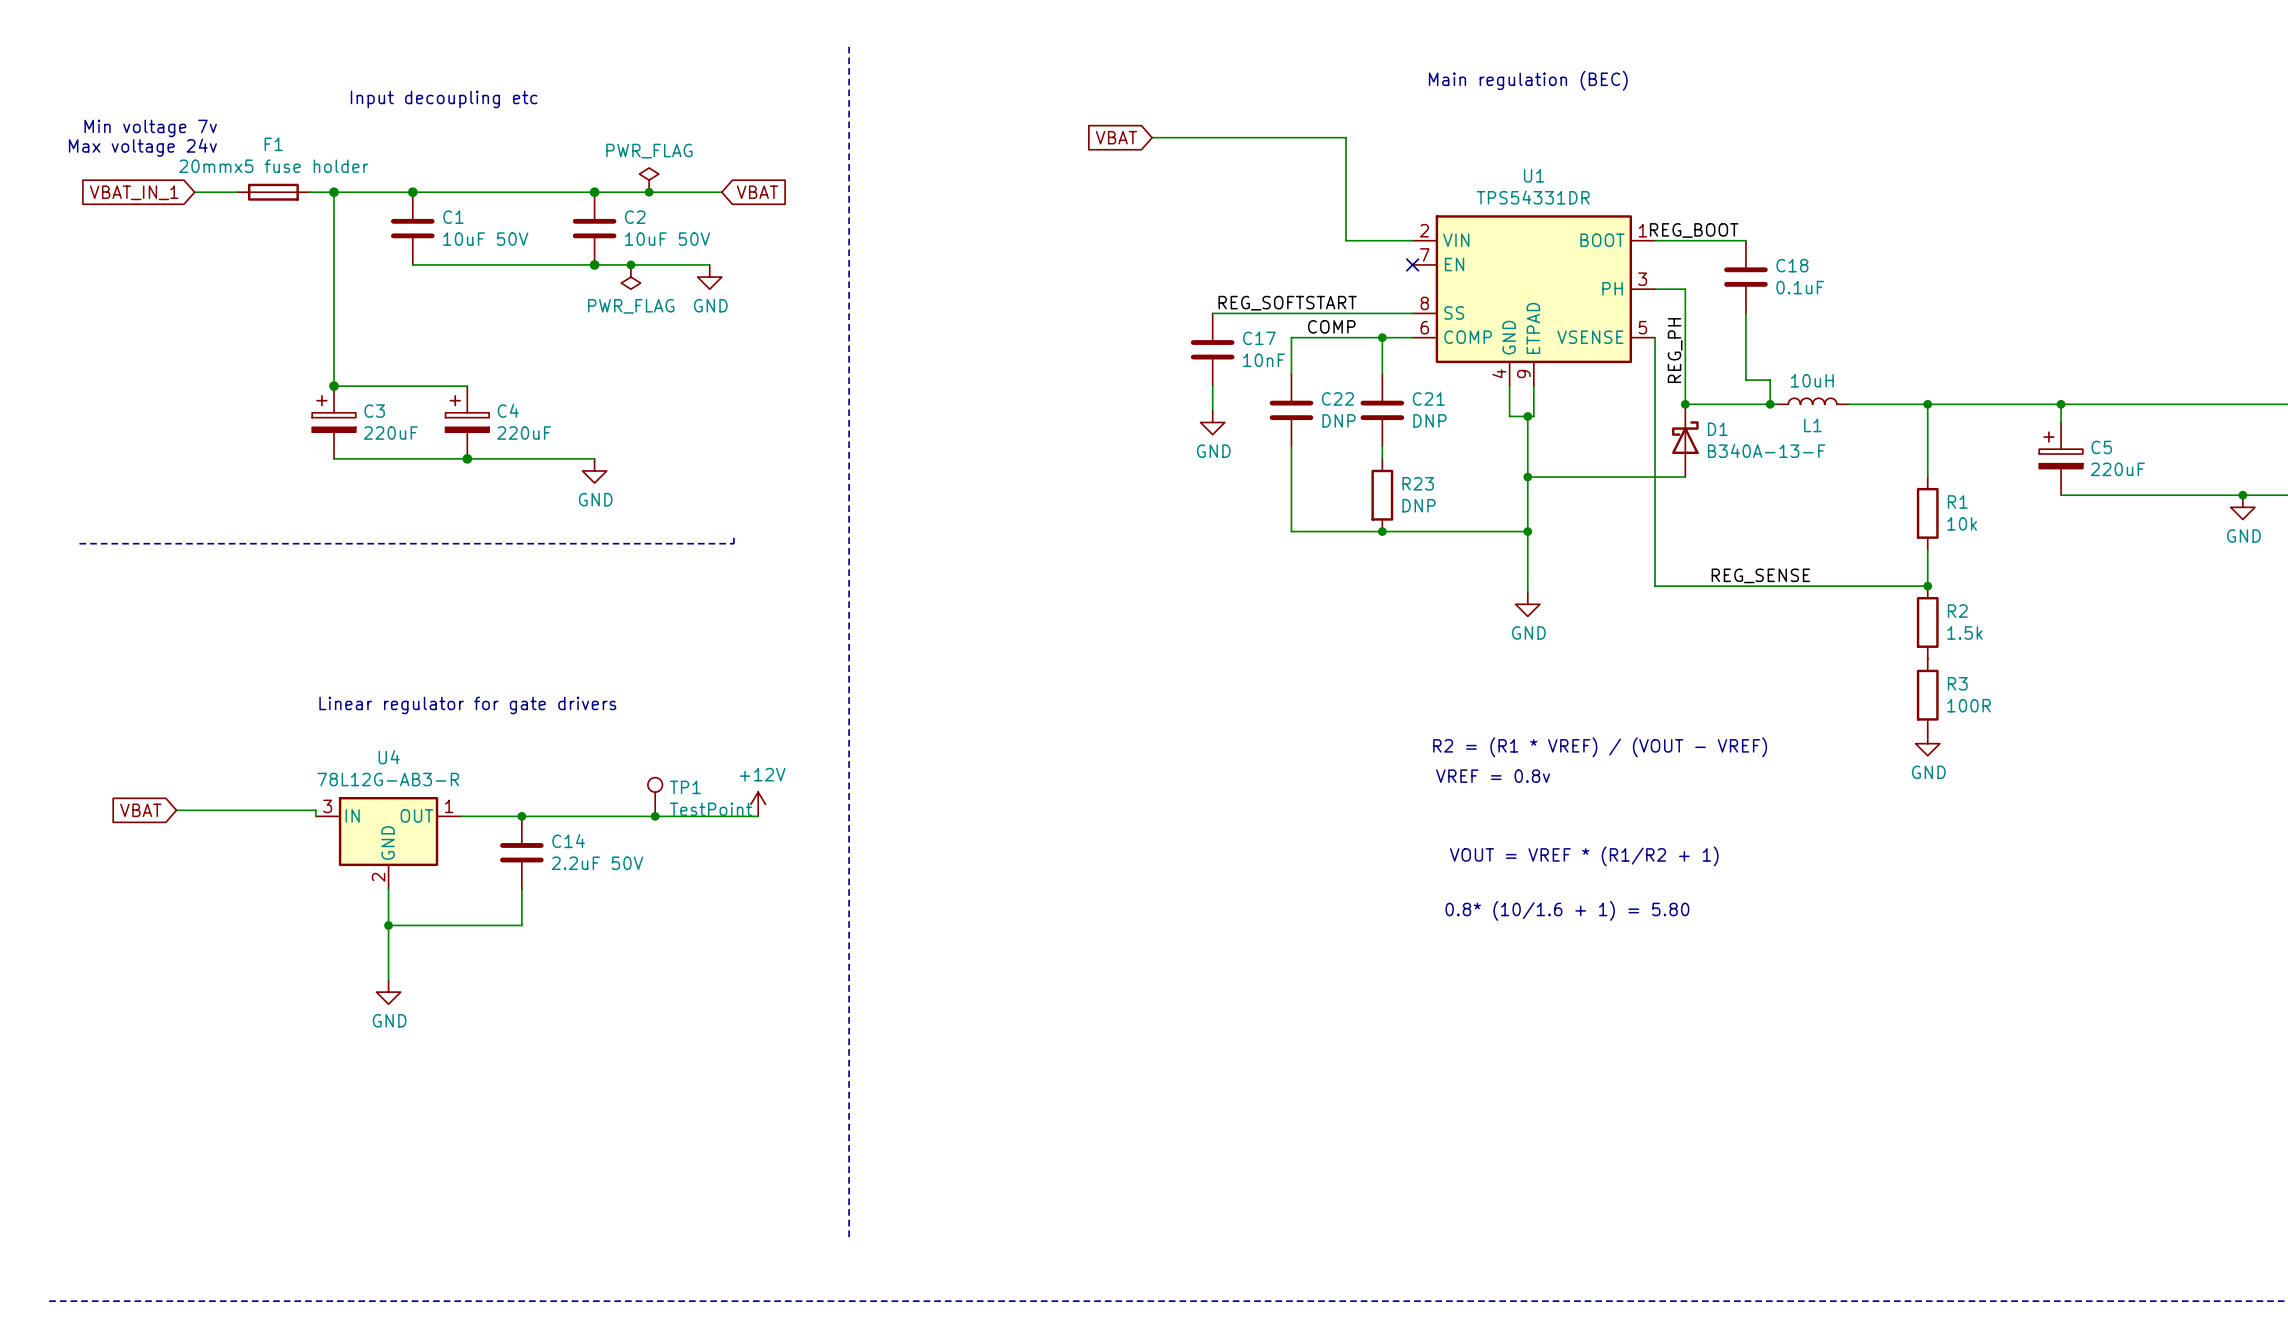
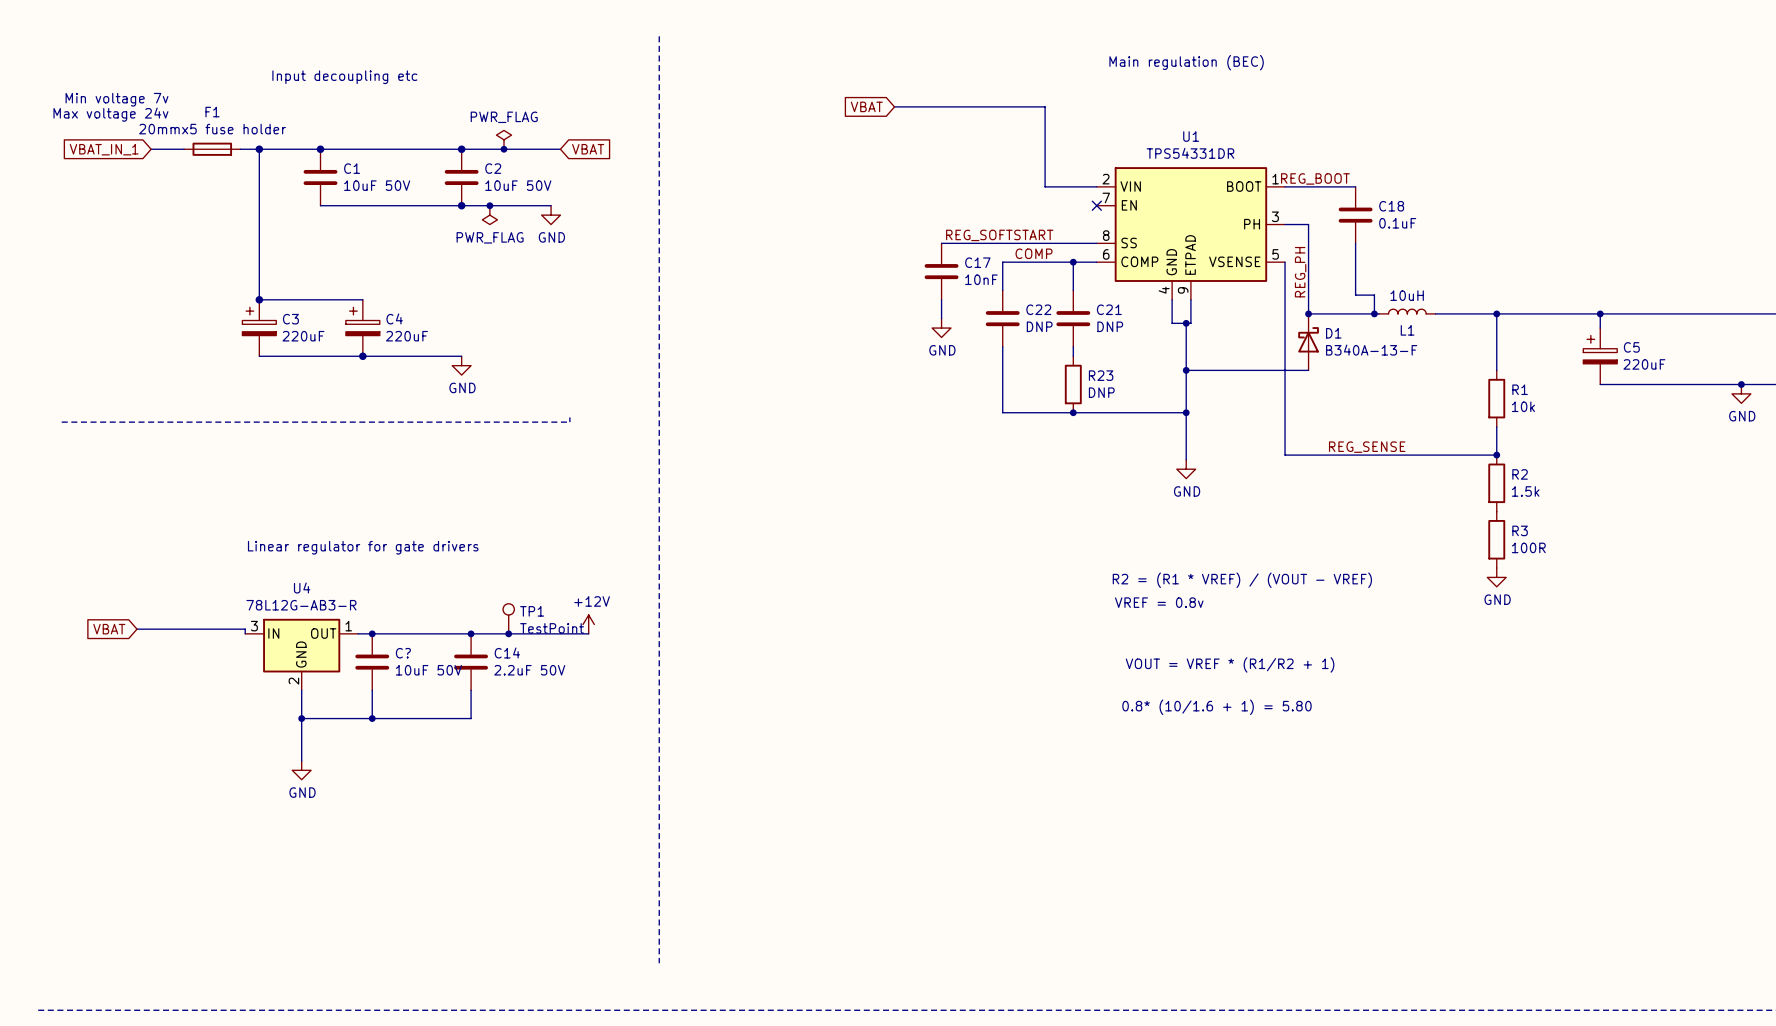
junction: none -> (372, 633)
junction: (521, 816) -> none
junction: none -> (471, 633)
C?: none -> 10uF 50V (372, 662)
C14 position: (521, 852) -> (471, 662)
wire: none -> (372, 690) (372, 718)
wire: (521, 889) (521, 925) -> (471, 690) (471, 718) (405, 718)
junction: none -> (372, 718)

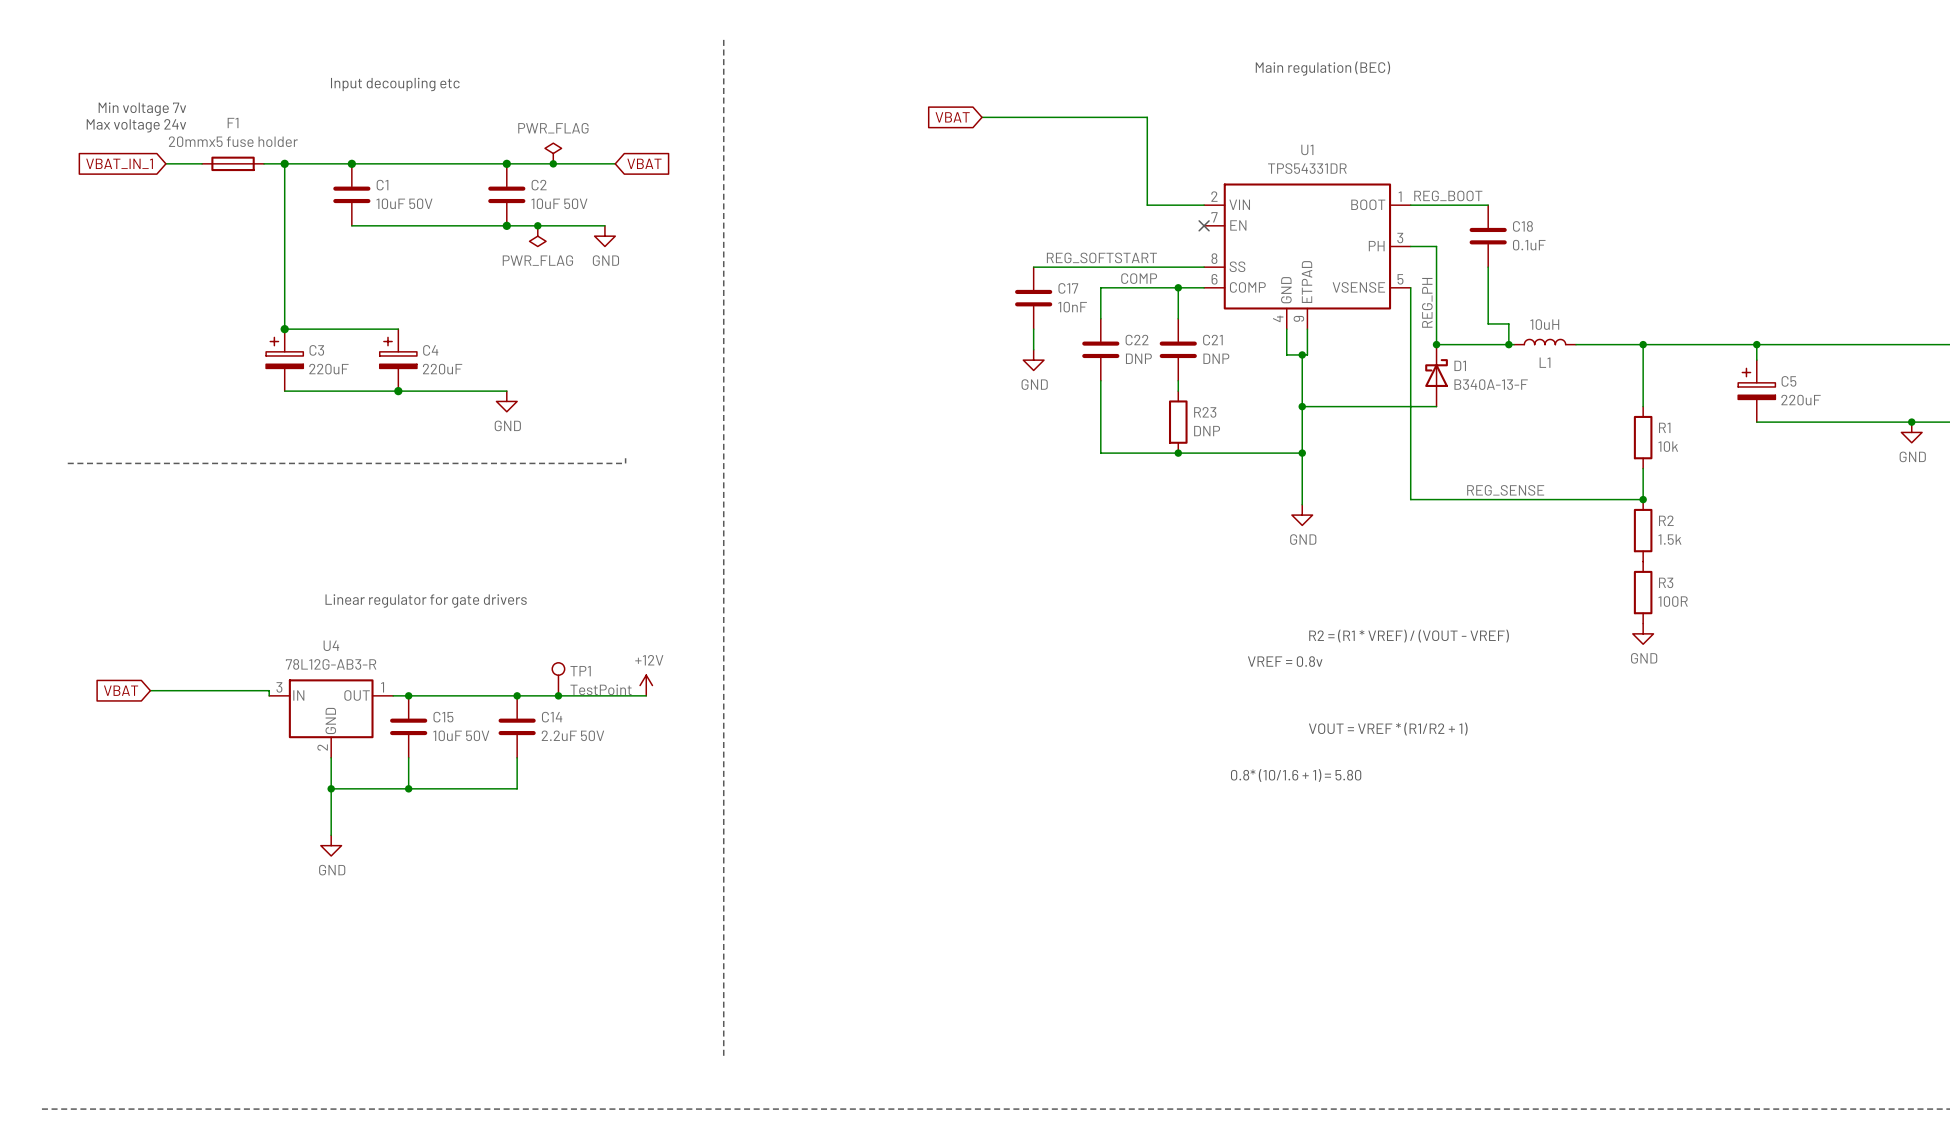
C? name: C? (403, 653) -> C15 (443, 717)

